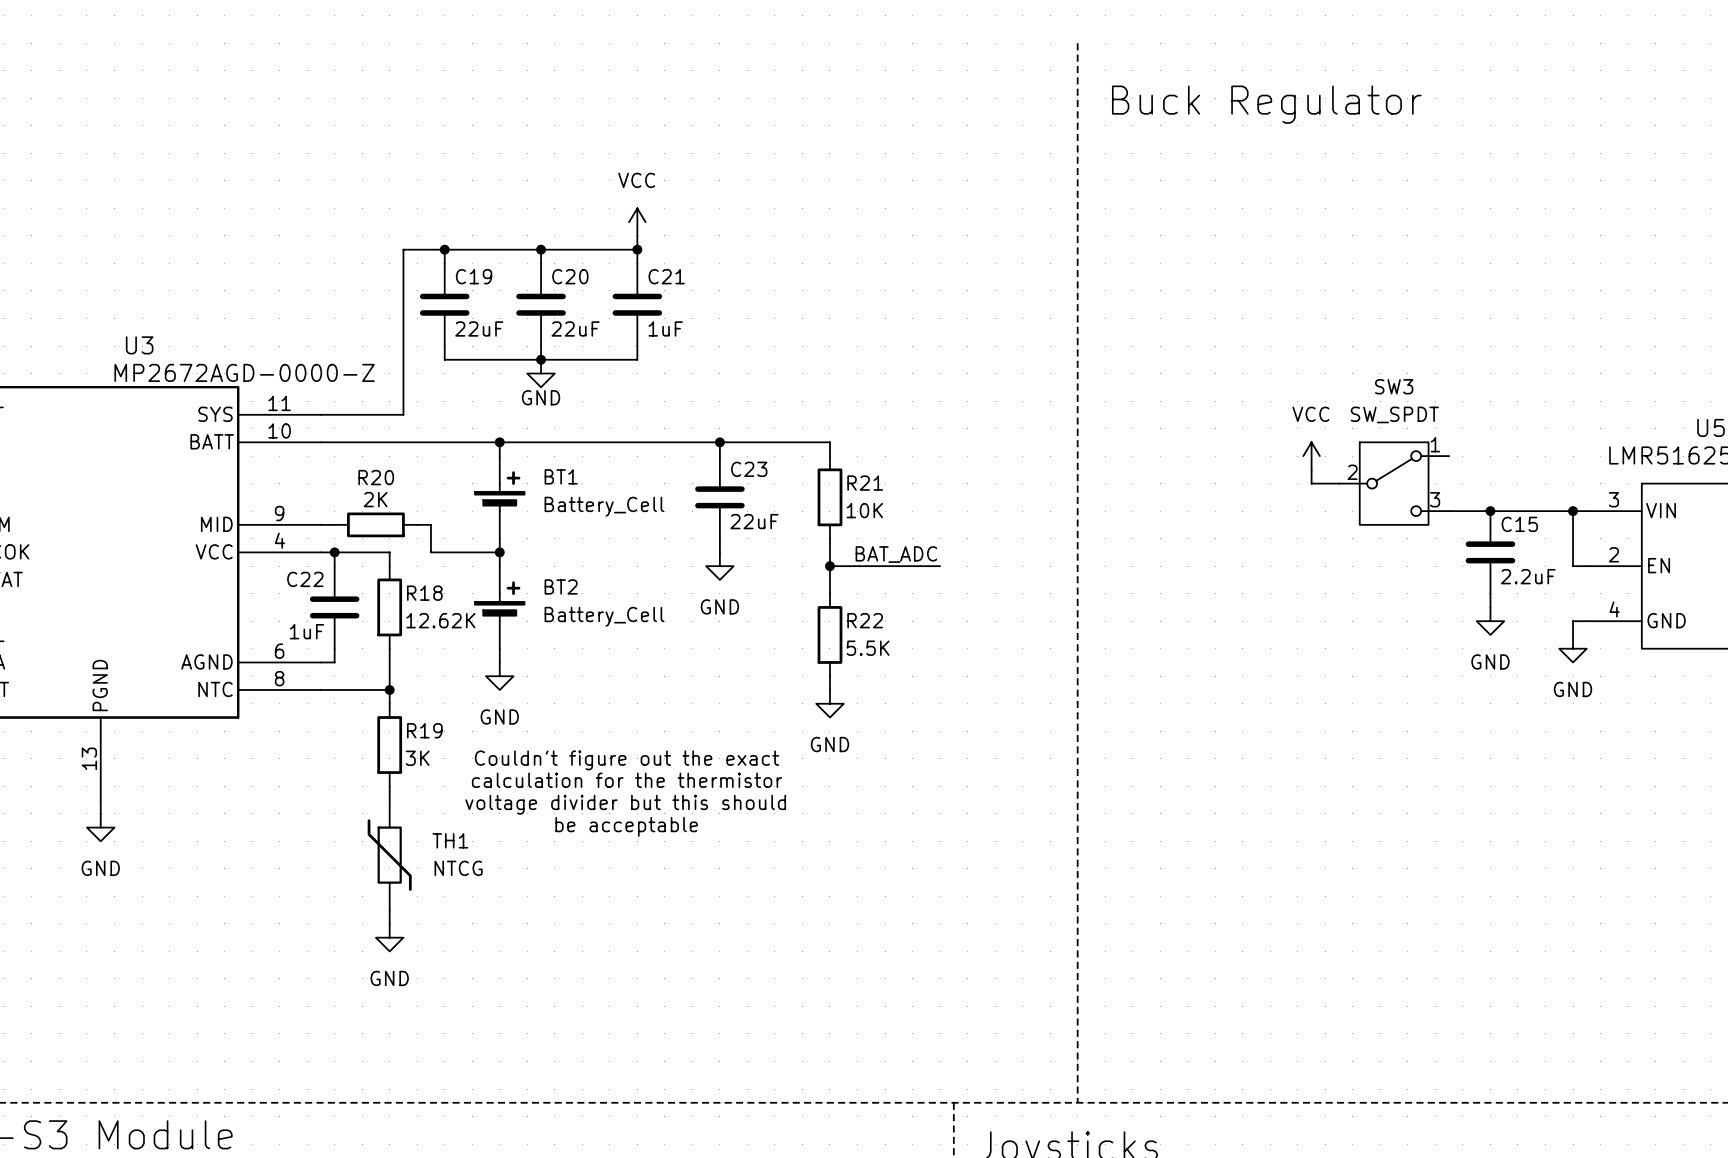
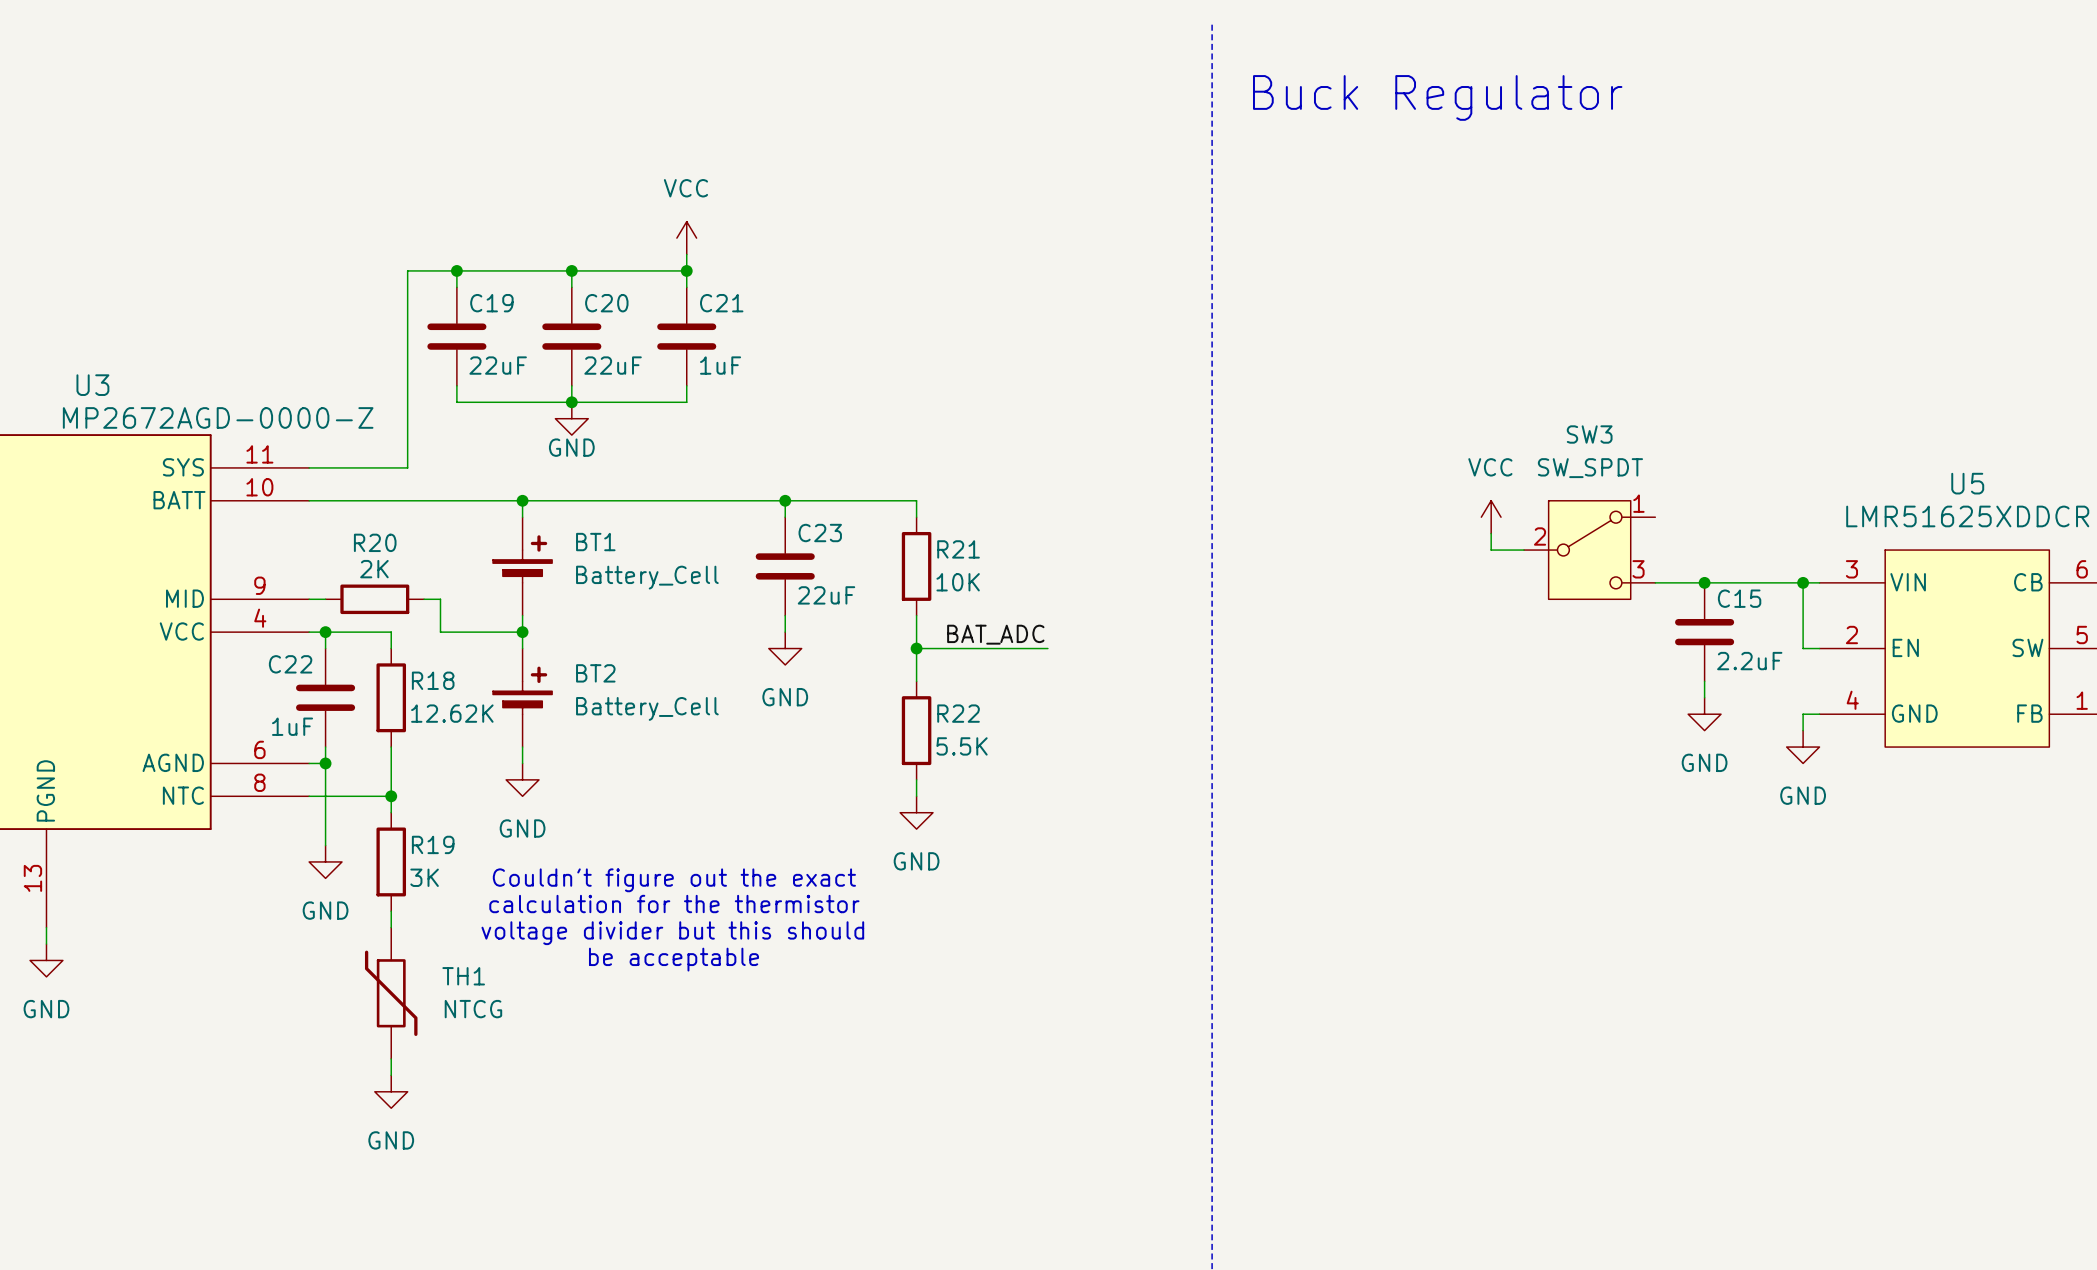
wire: none -> (325, 763) (325, 845)
junction: none -> (325, 763)
power symbol: none -> GND (325, 861)

